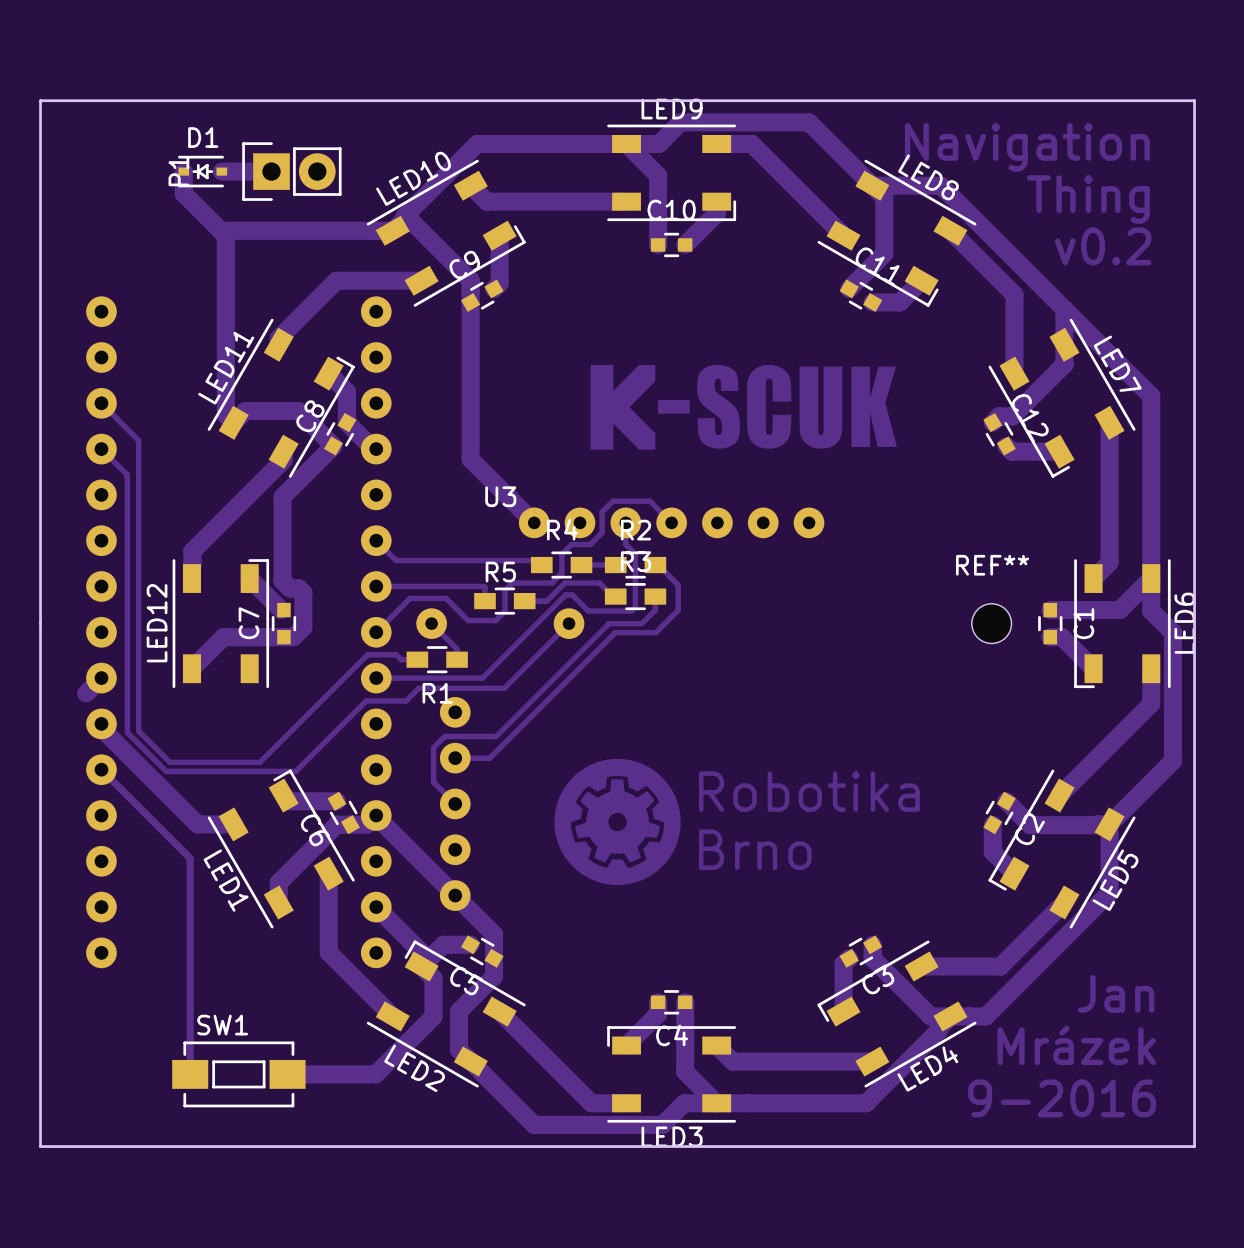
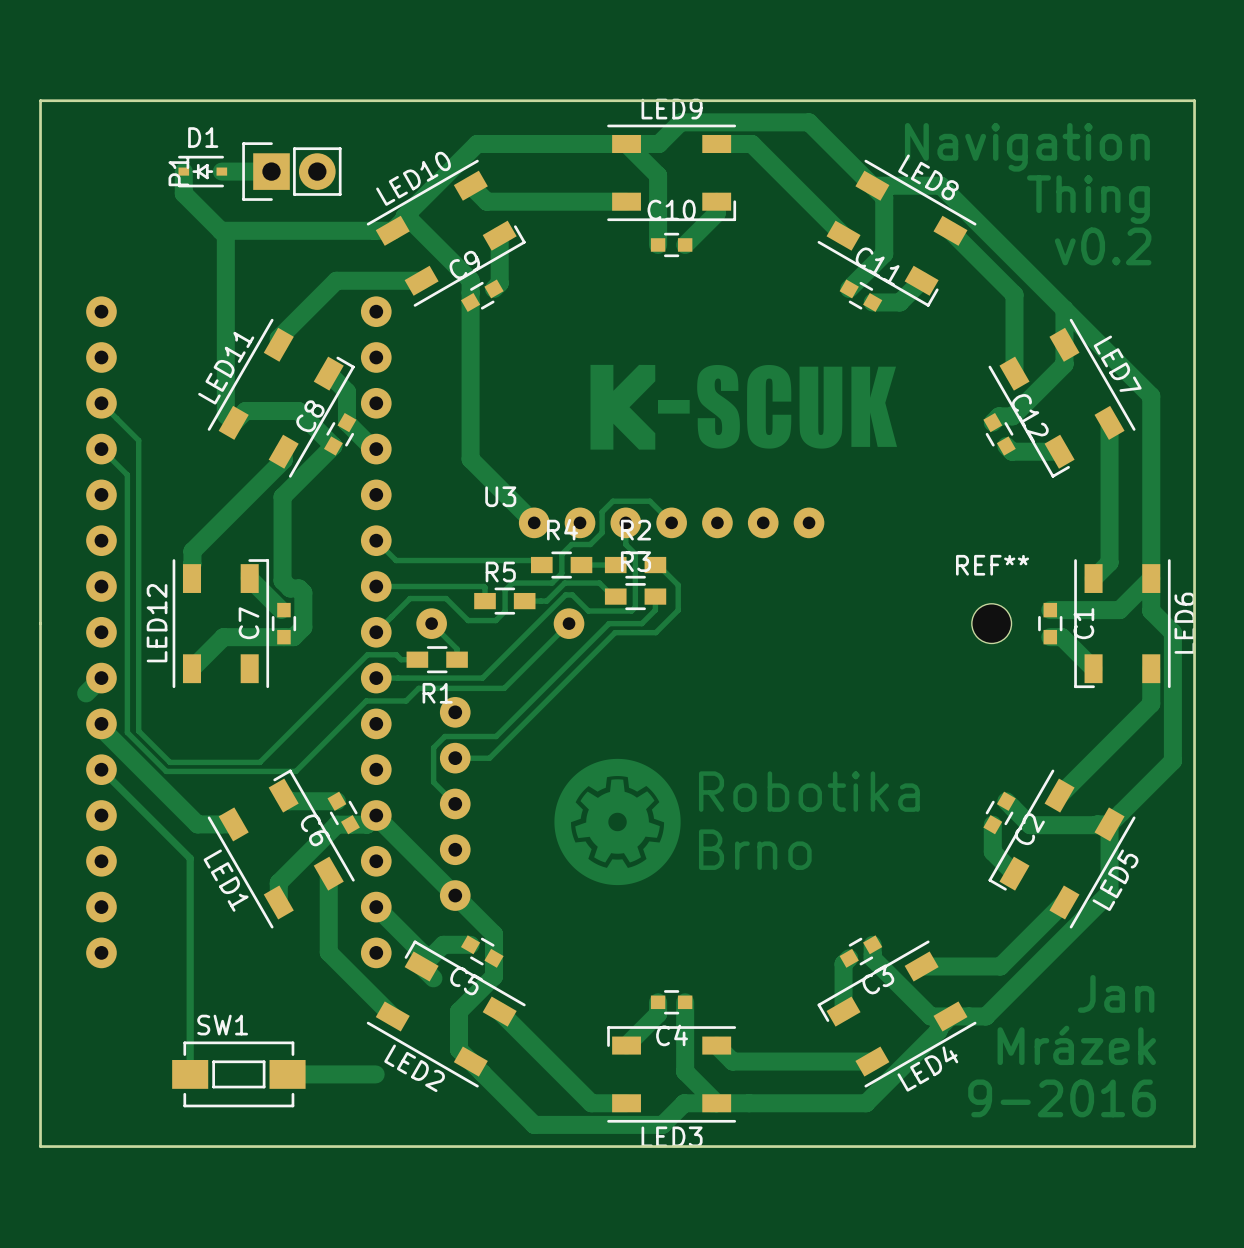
track: (433, 978) (433, 1016) (375, 1074) -> none

